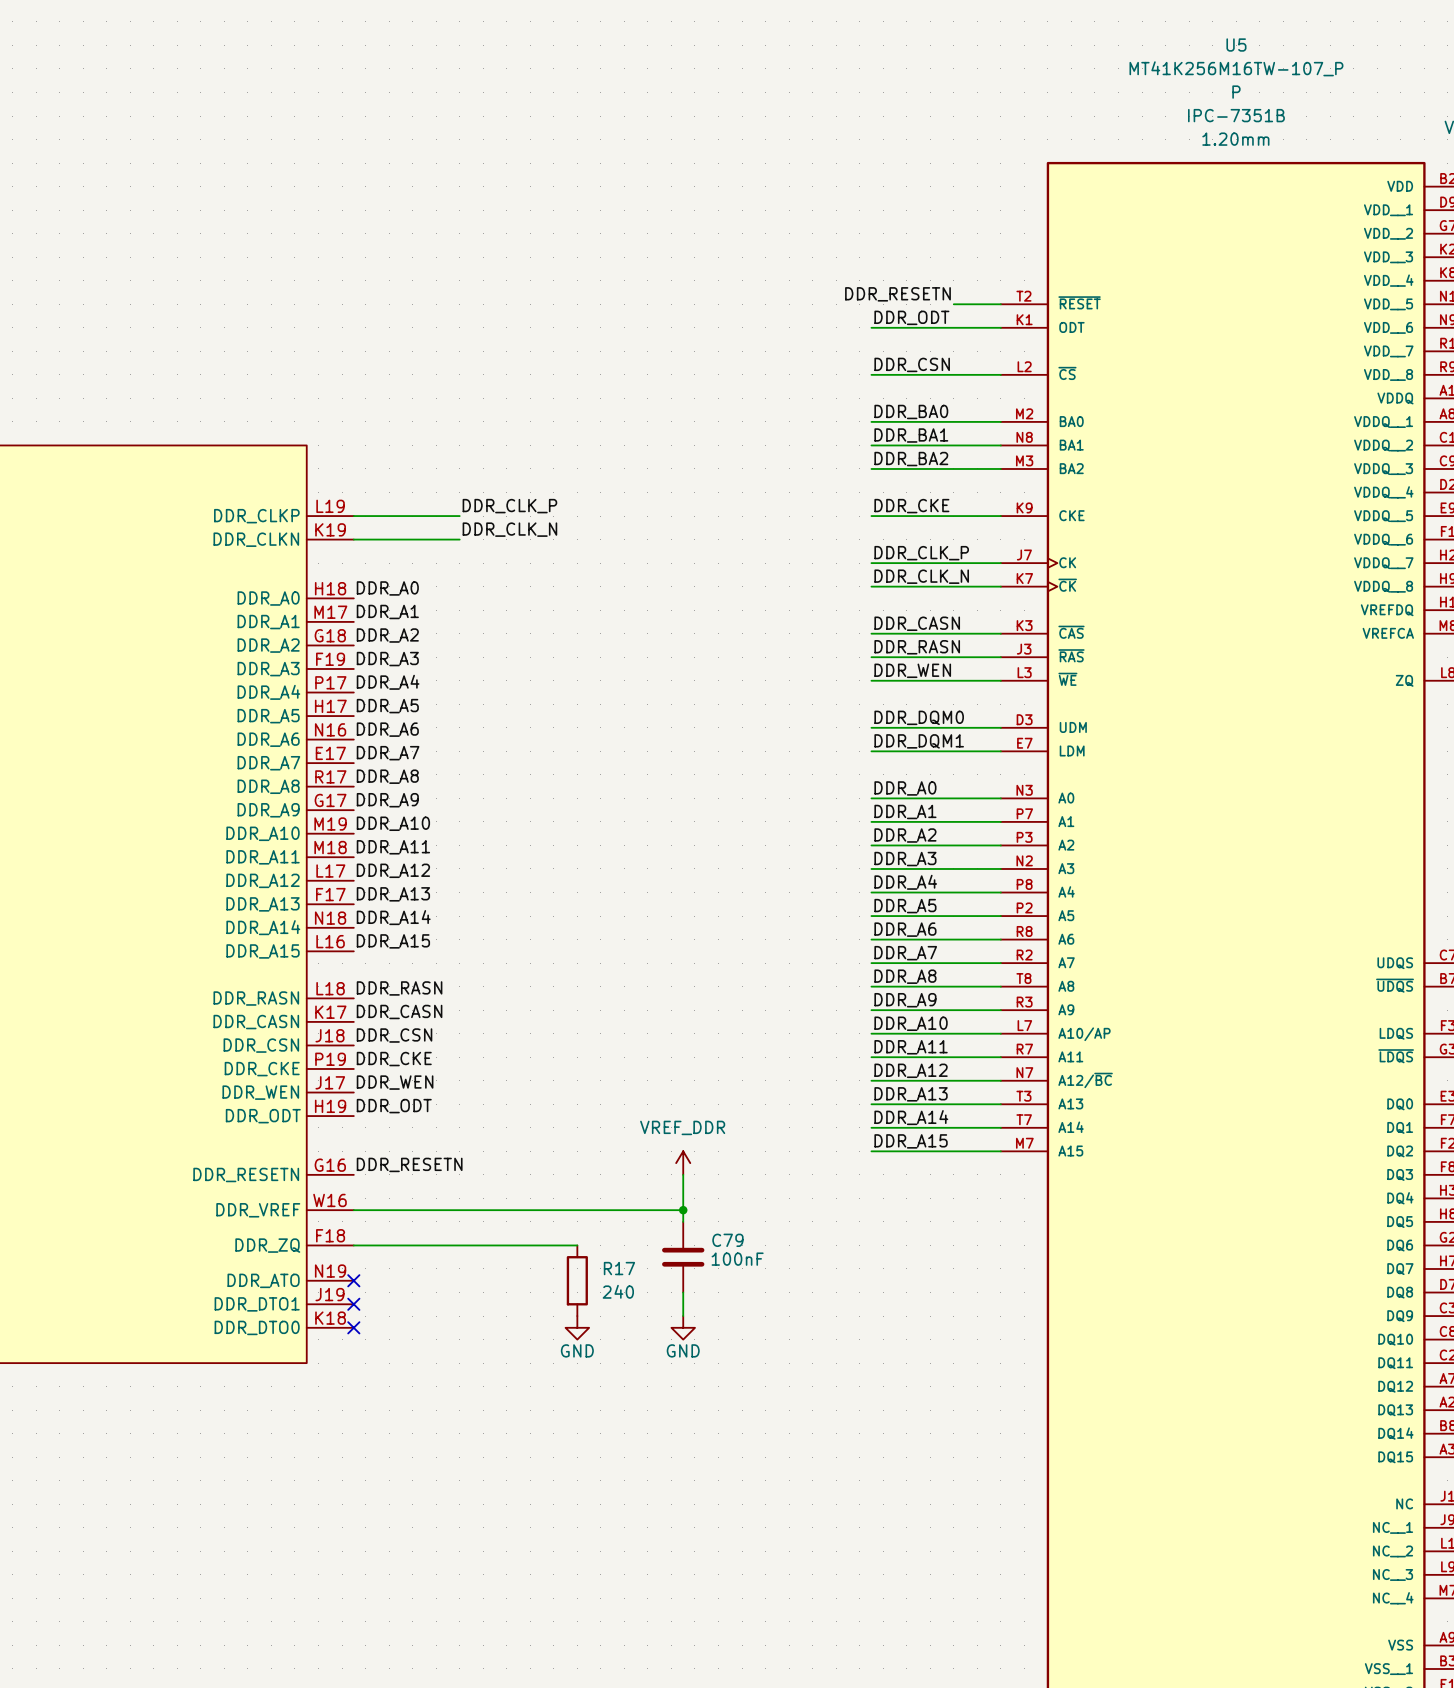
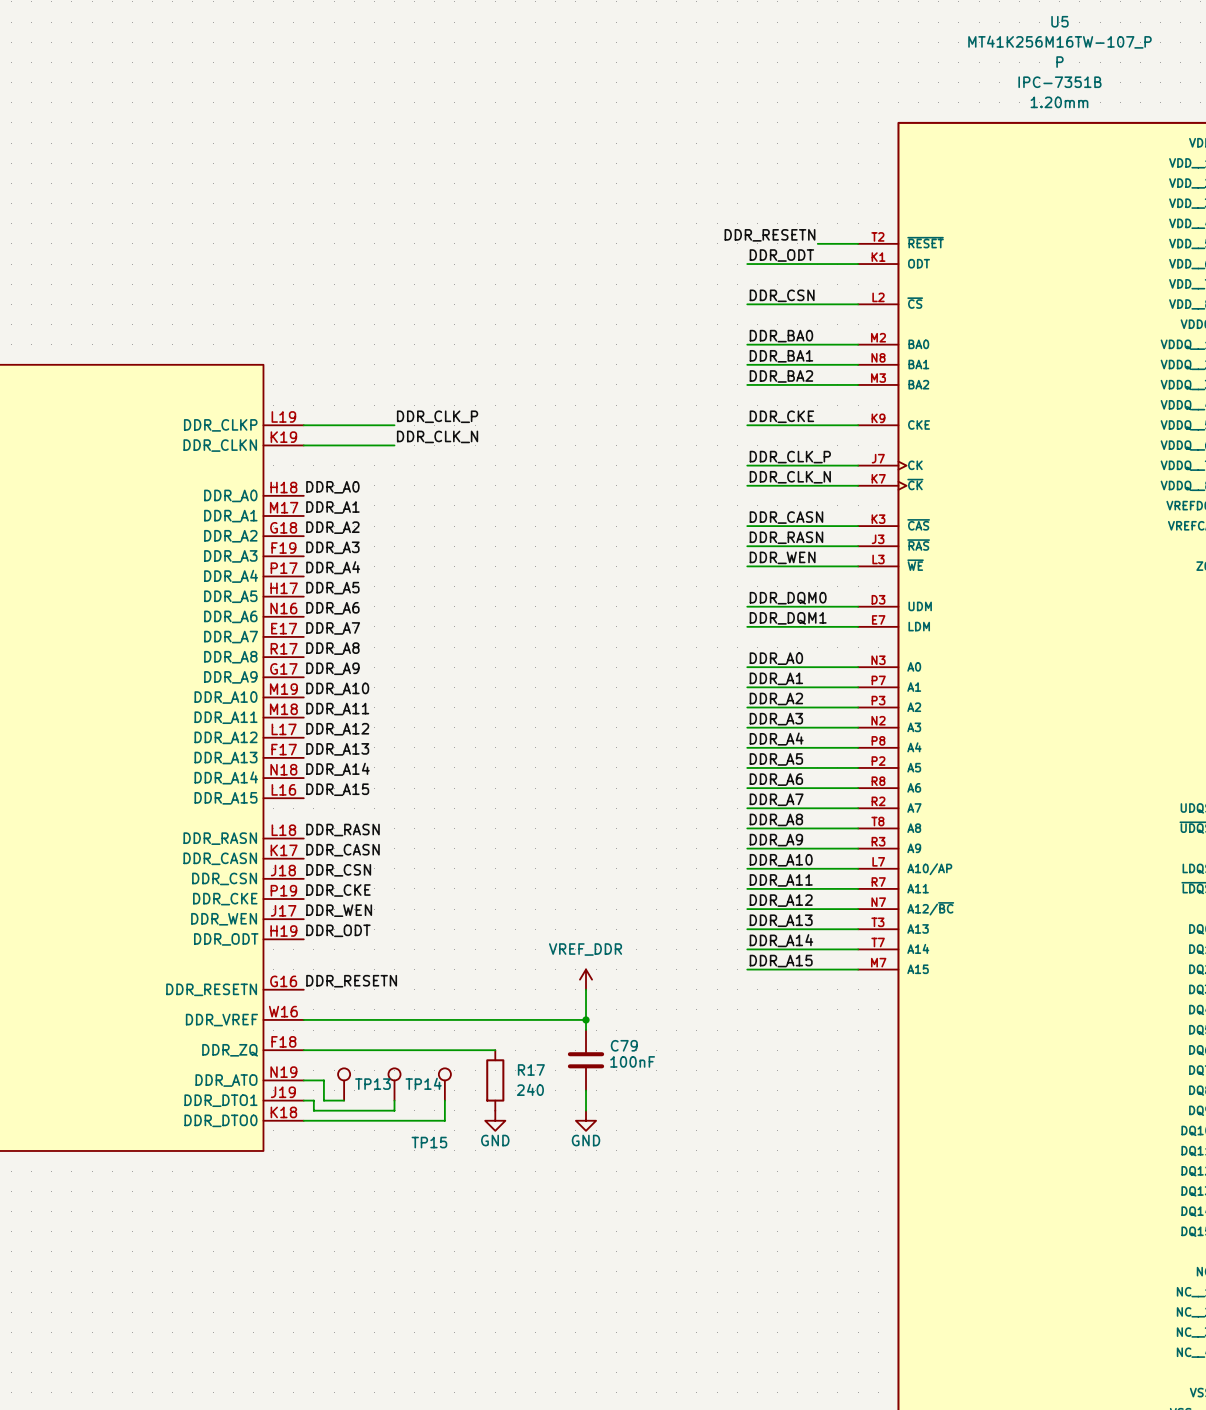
wire: none -> (303, 1080) (323, 1080) (323, 1100) (344, 1100)
no-connect mark: (353, 1280) -> none
TP13: none -> (344, 1084)
TP14: none -> (394, 1084)
TP15: none -> (444, 1084)
wire: none -> (303, 1100) (313, 1100) (313, 1110) (394, 1110) (394, 1100)
no-connect mark: (353, 1304) -> none
wire: none -> (444, 1100) (444, 1120) (303, 1120)
no-connect mark: (353, 1327) -> none

